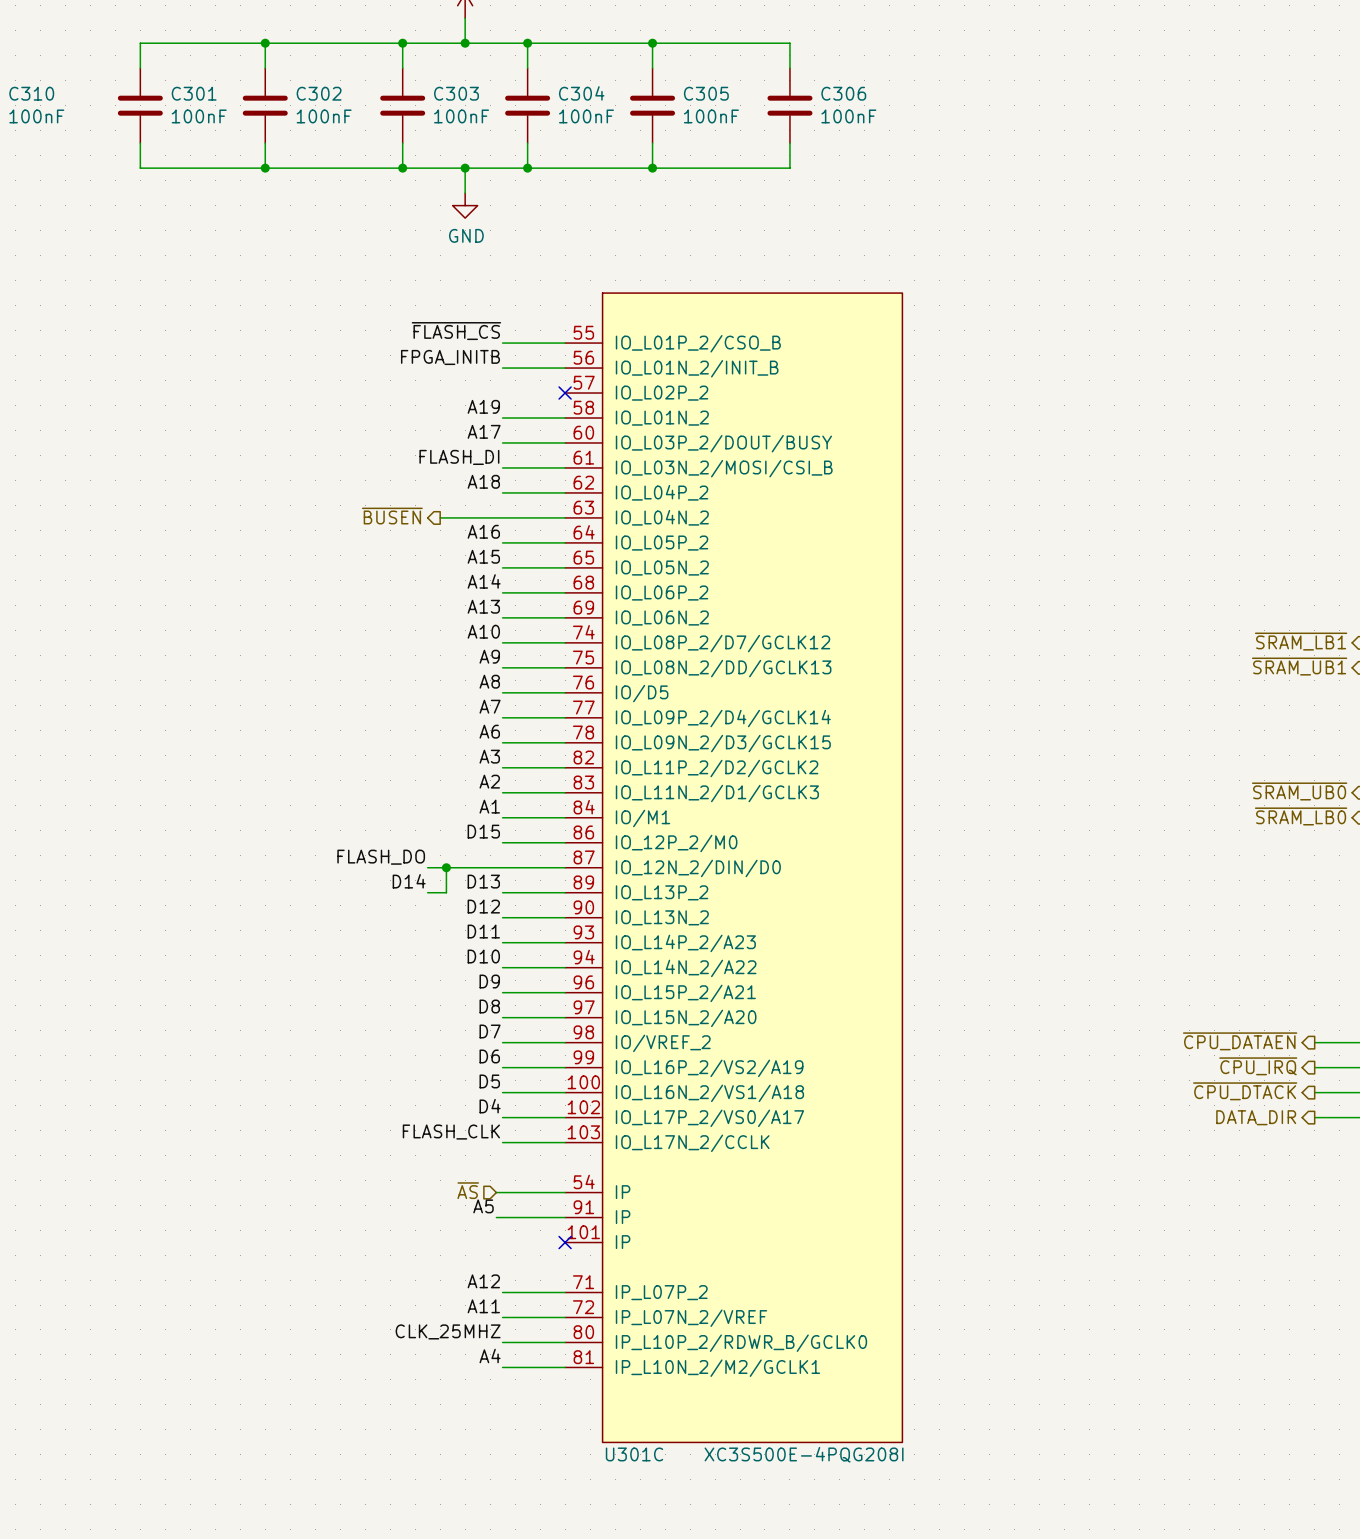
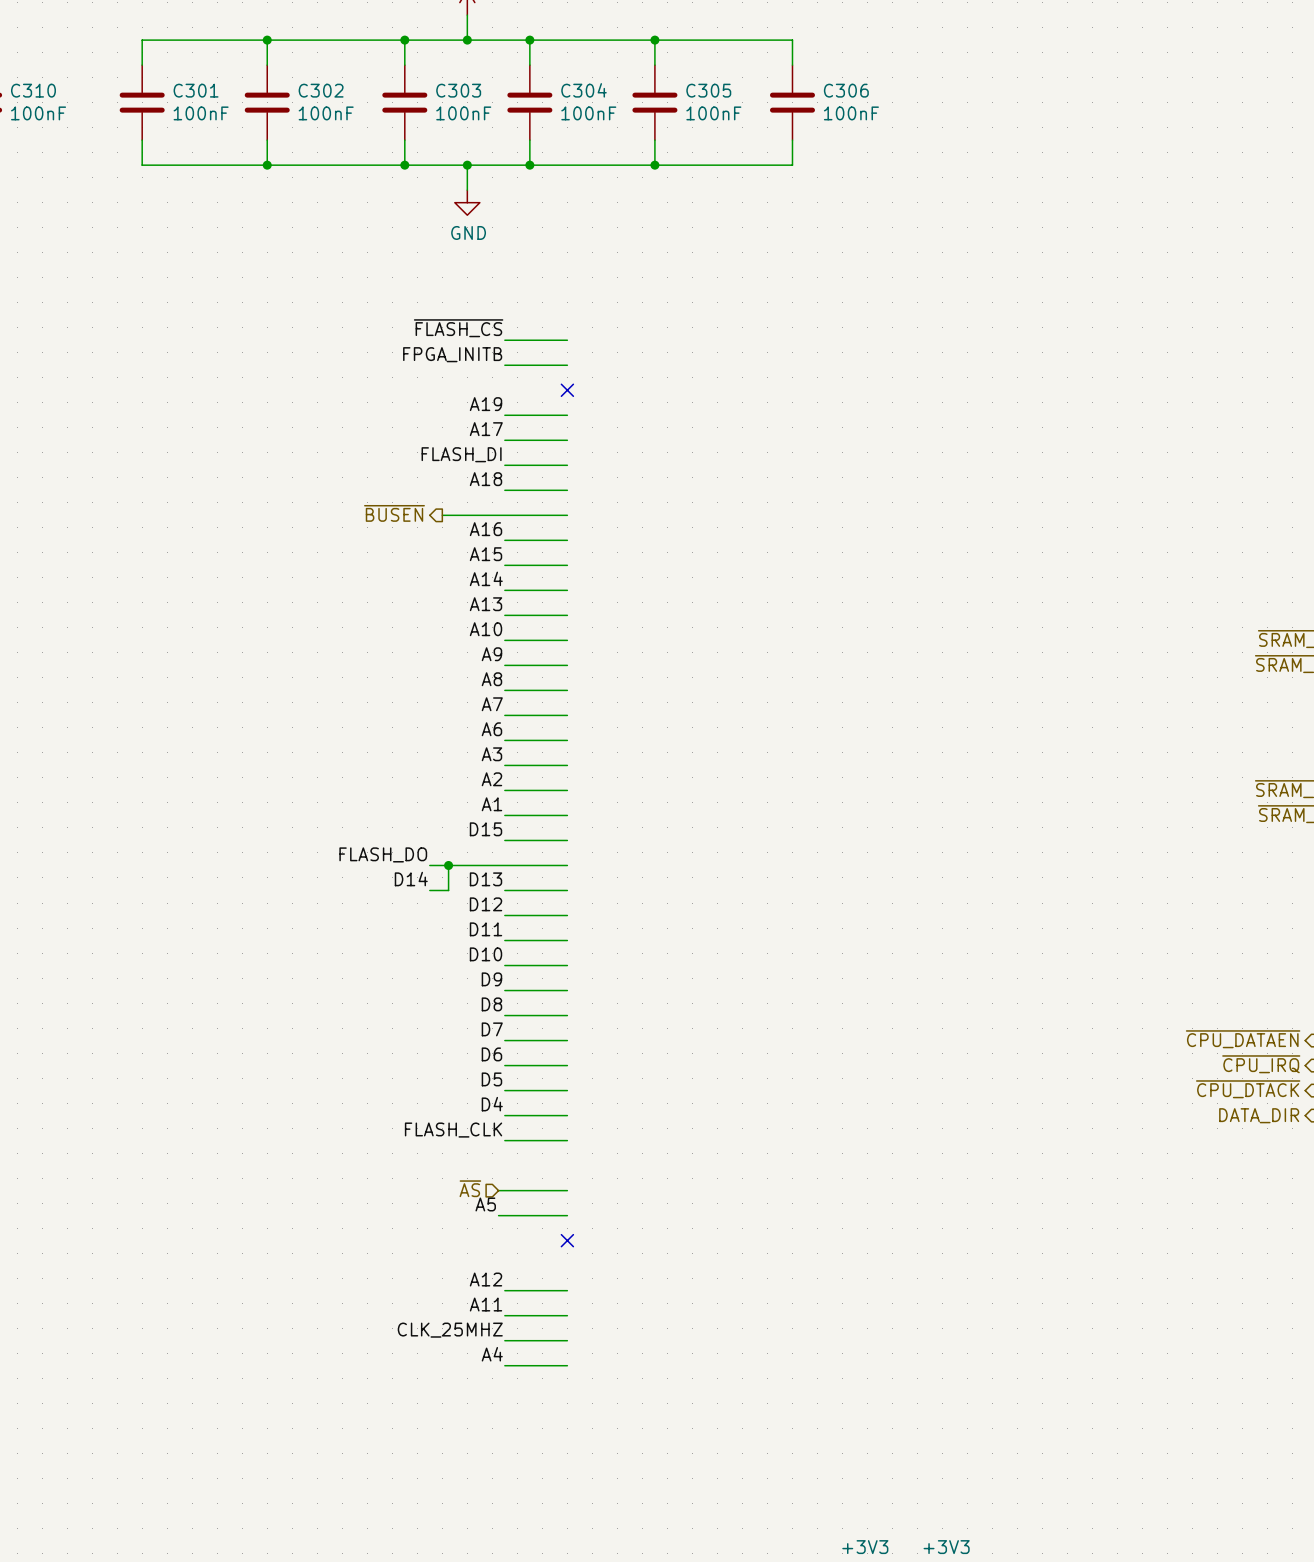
U301C: XC3S500E-4PQG208I (733, 867) -> none

